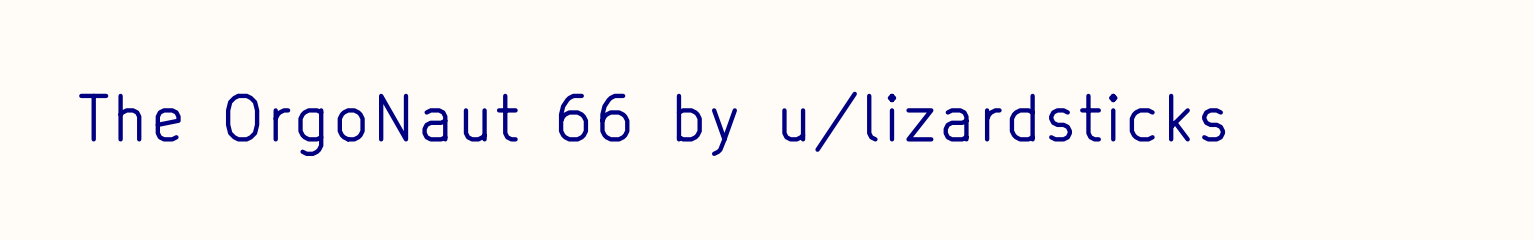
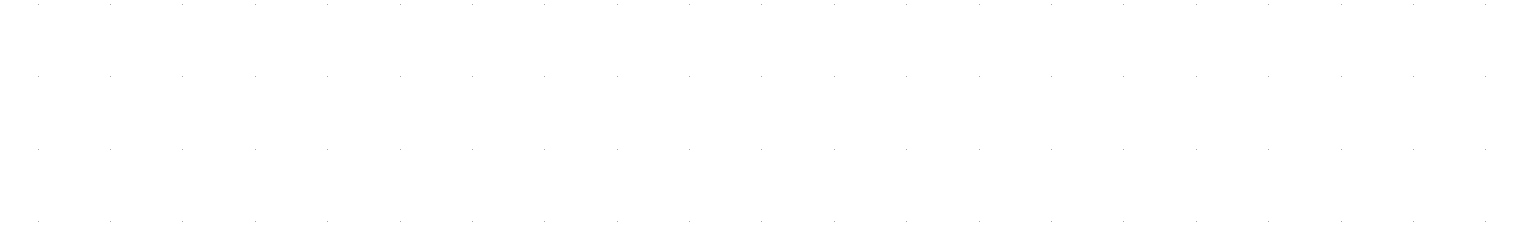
text: The OrgoNaut 66 by u/lizardsticks (652, 123) -> none

